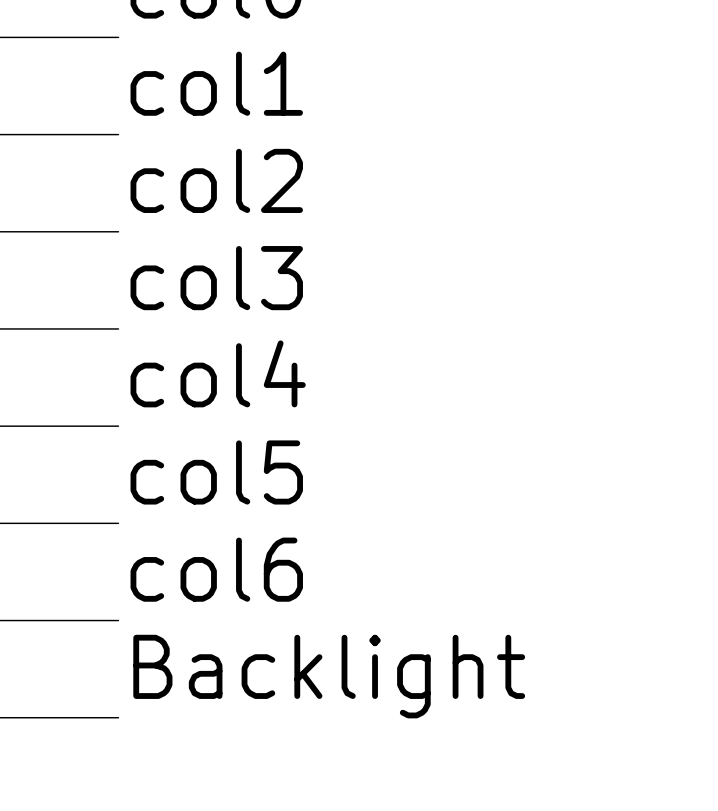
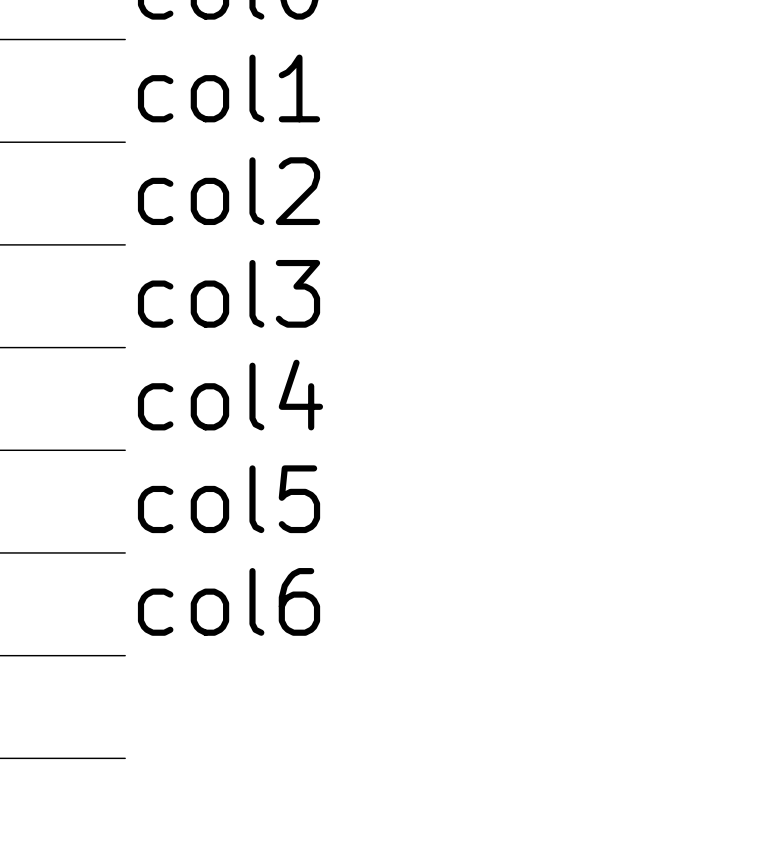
label: Backlight (329, 676) -> none

